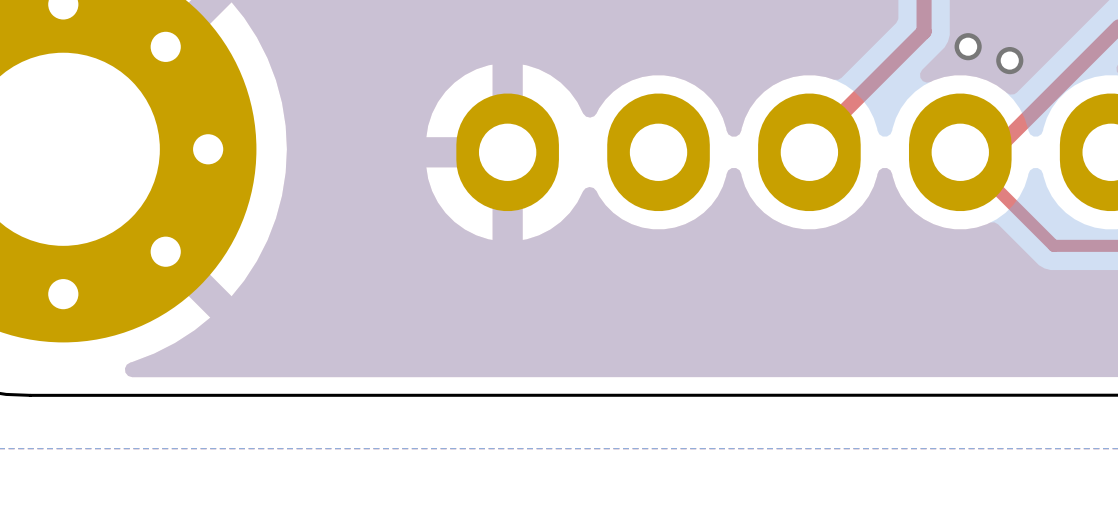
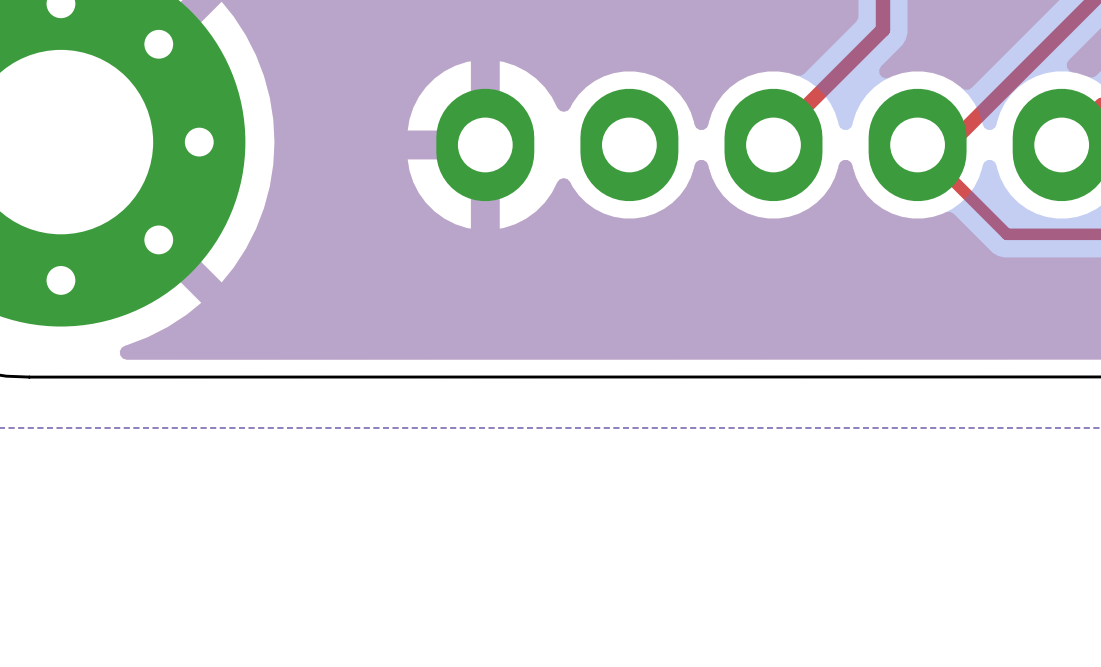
via: (968, 46) -> none
via: (1009, 60) -> none

